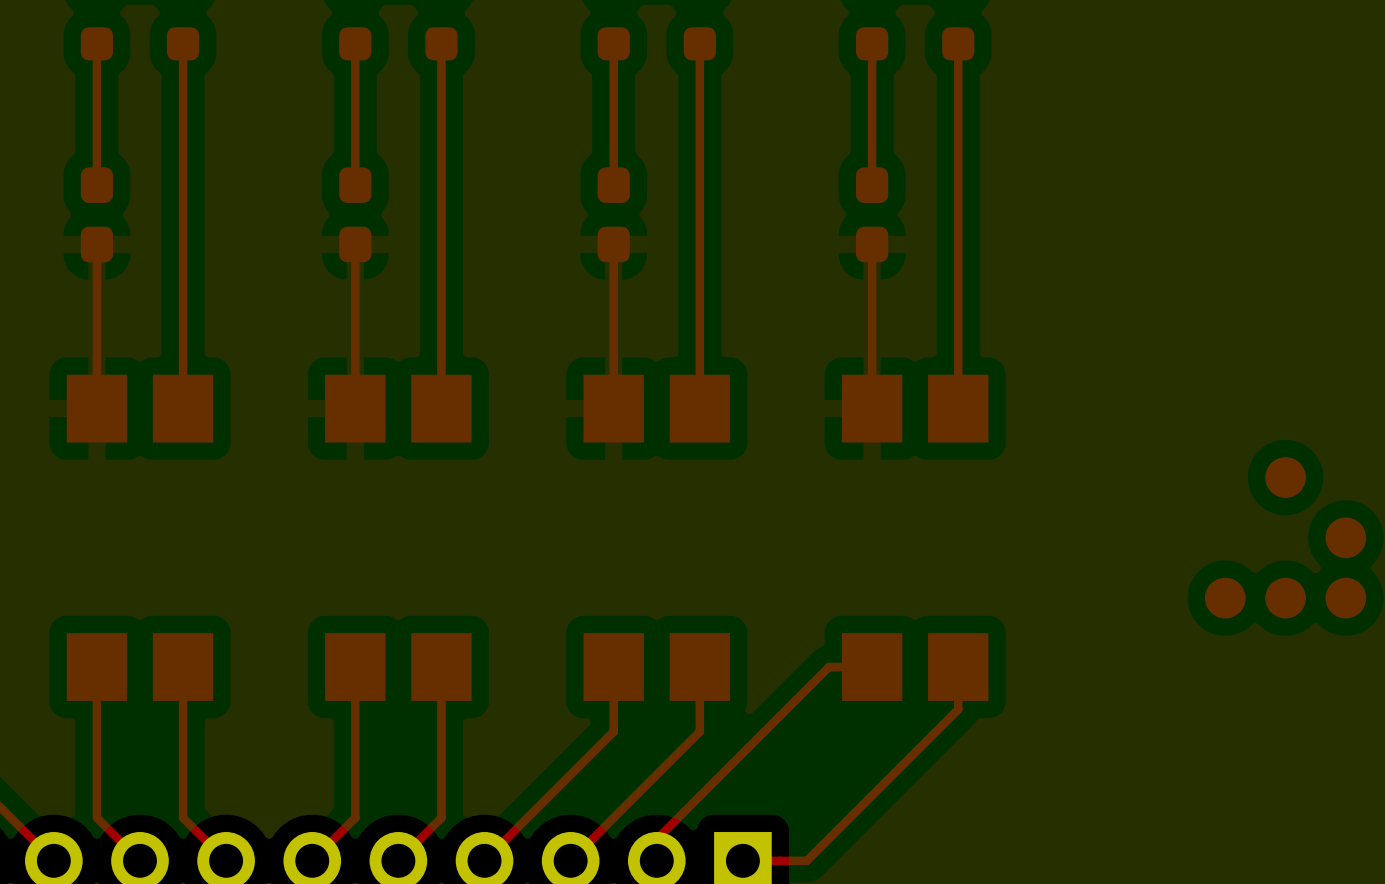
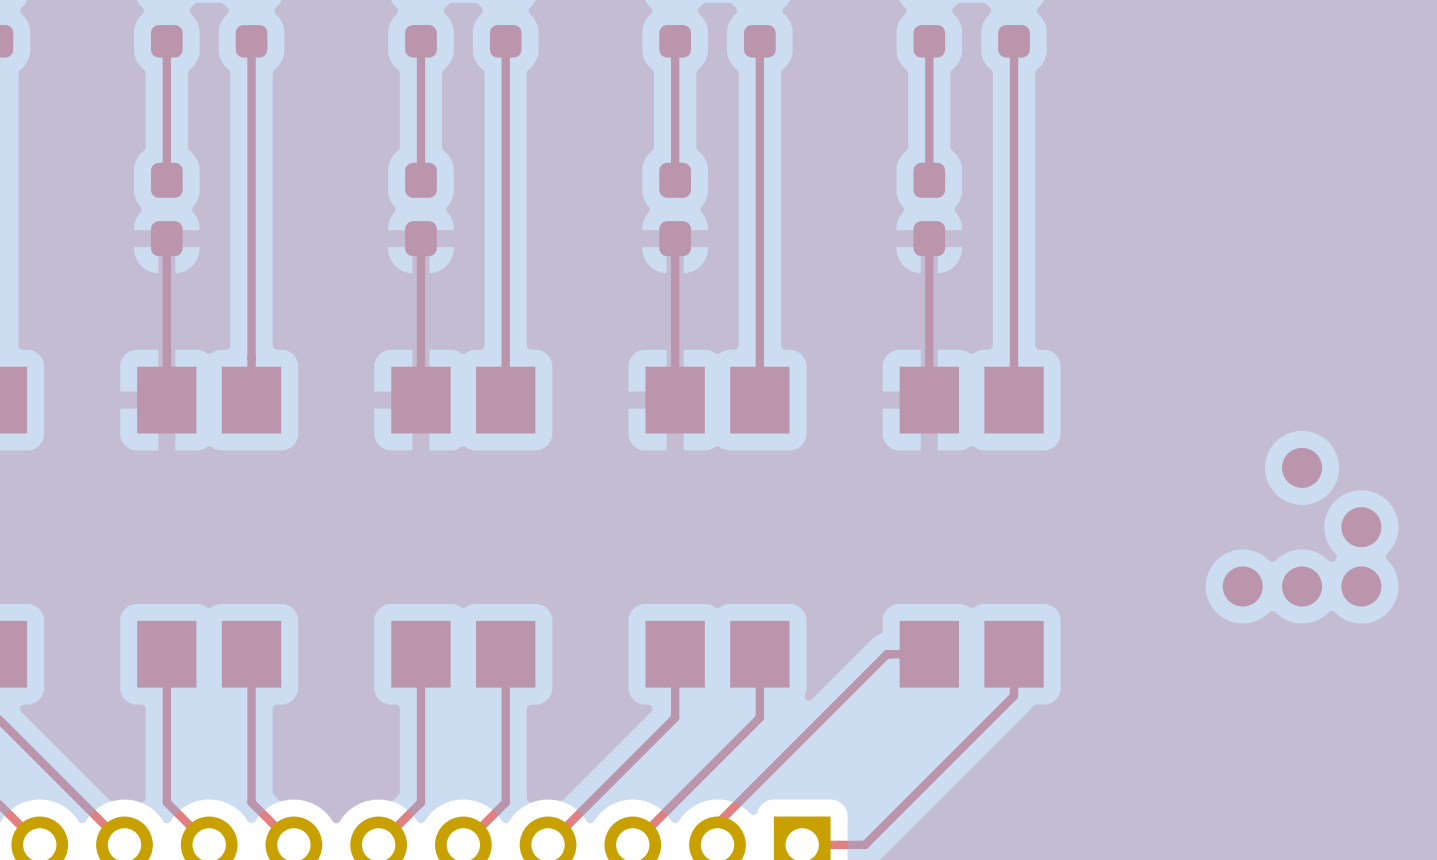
part position: (1285, 537) -> (1302, 527)

